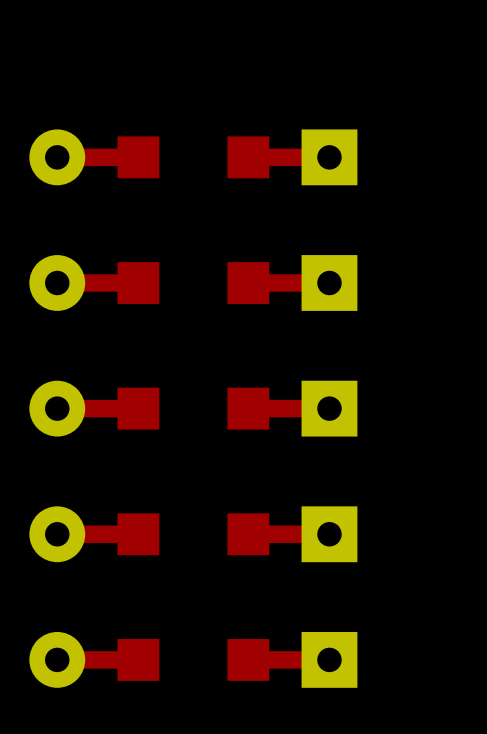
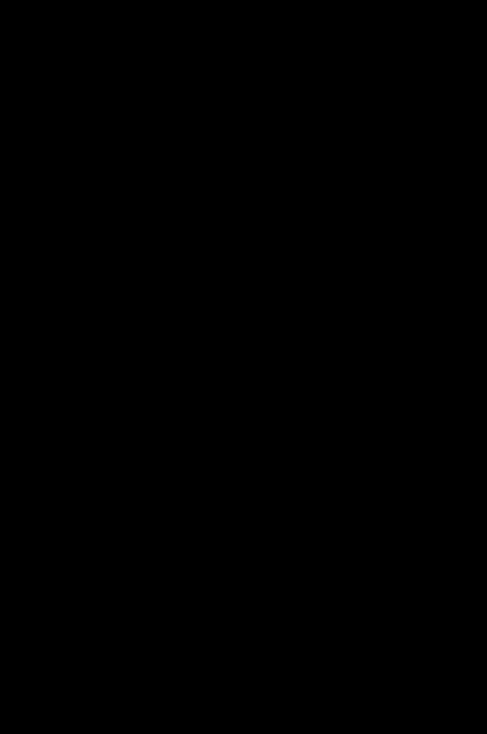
part: (193, 157) -> none
part: (193, 282) -> none
part: (193, 408) -> none
part: (193, 534) -> none
part: (193, 659) -> none

